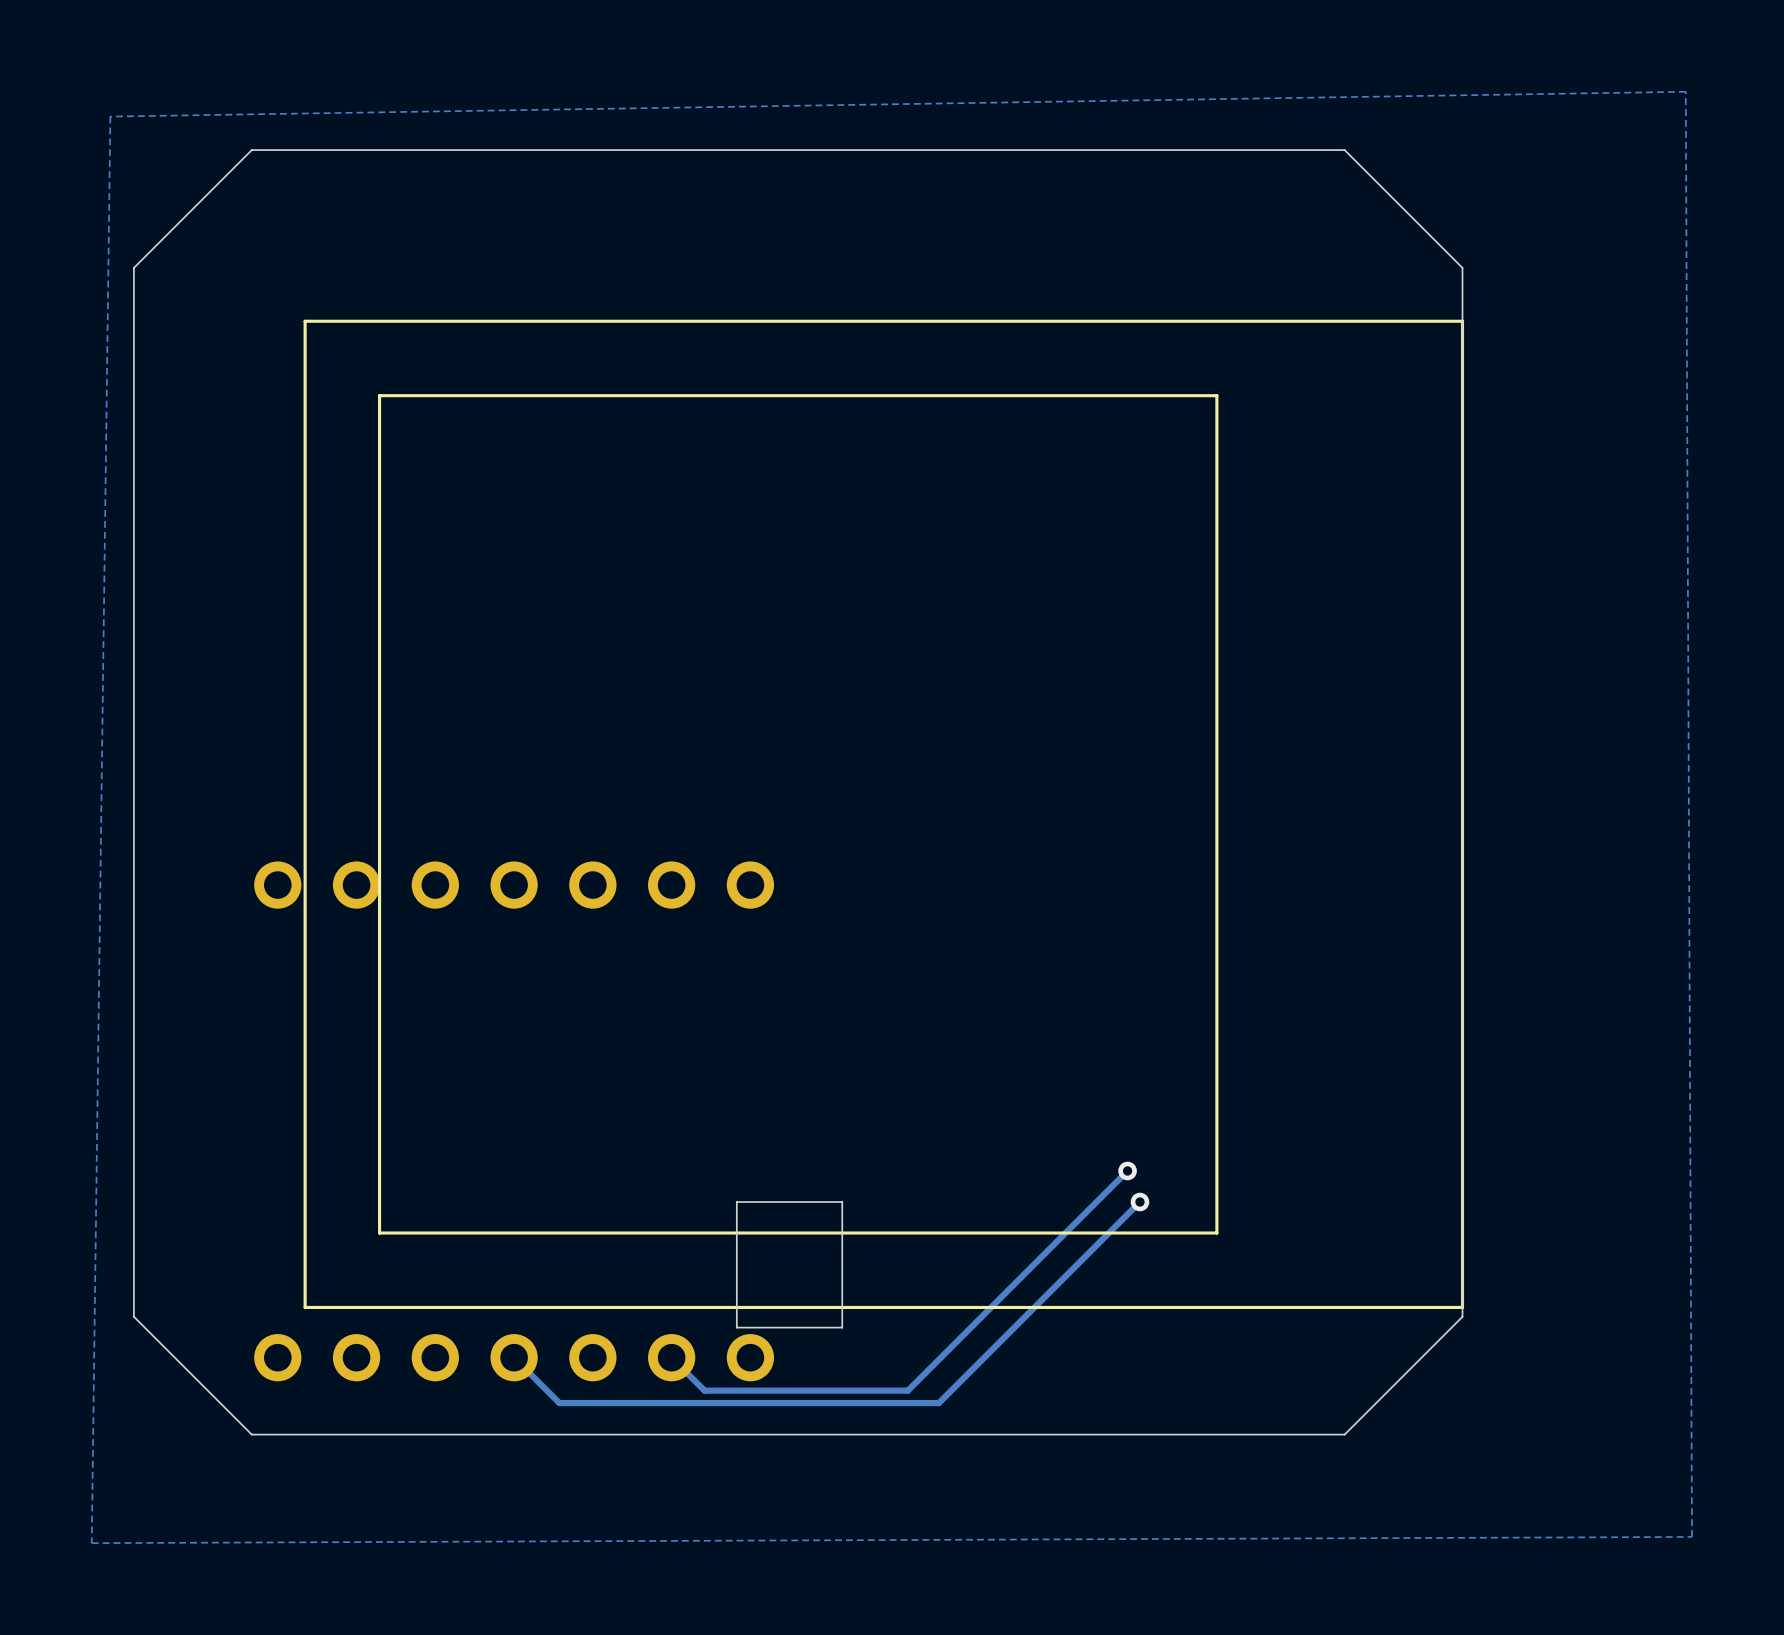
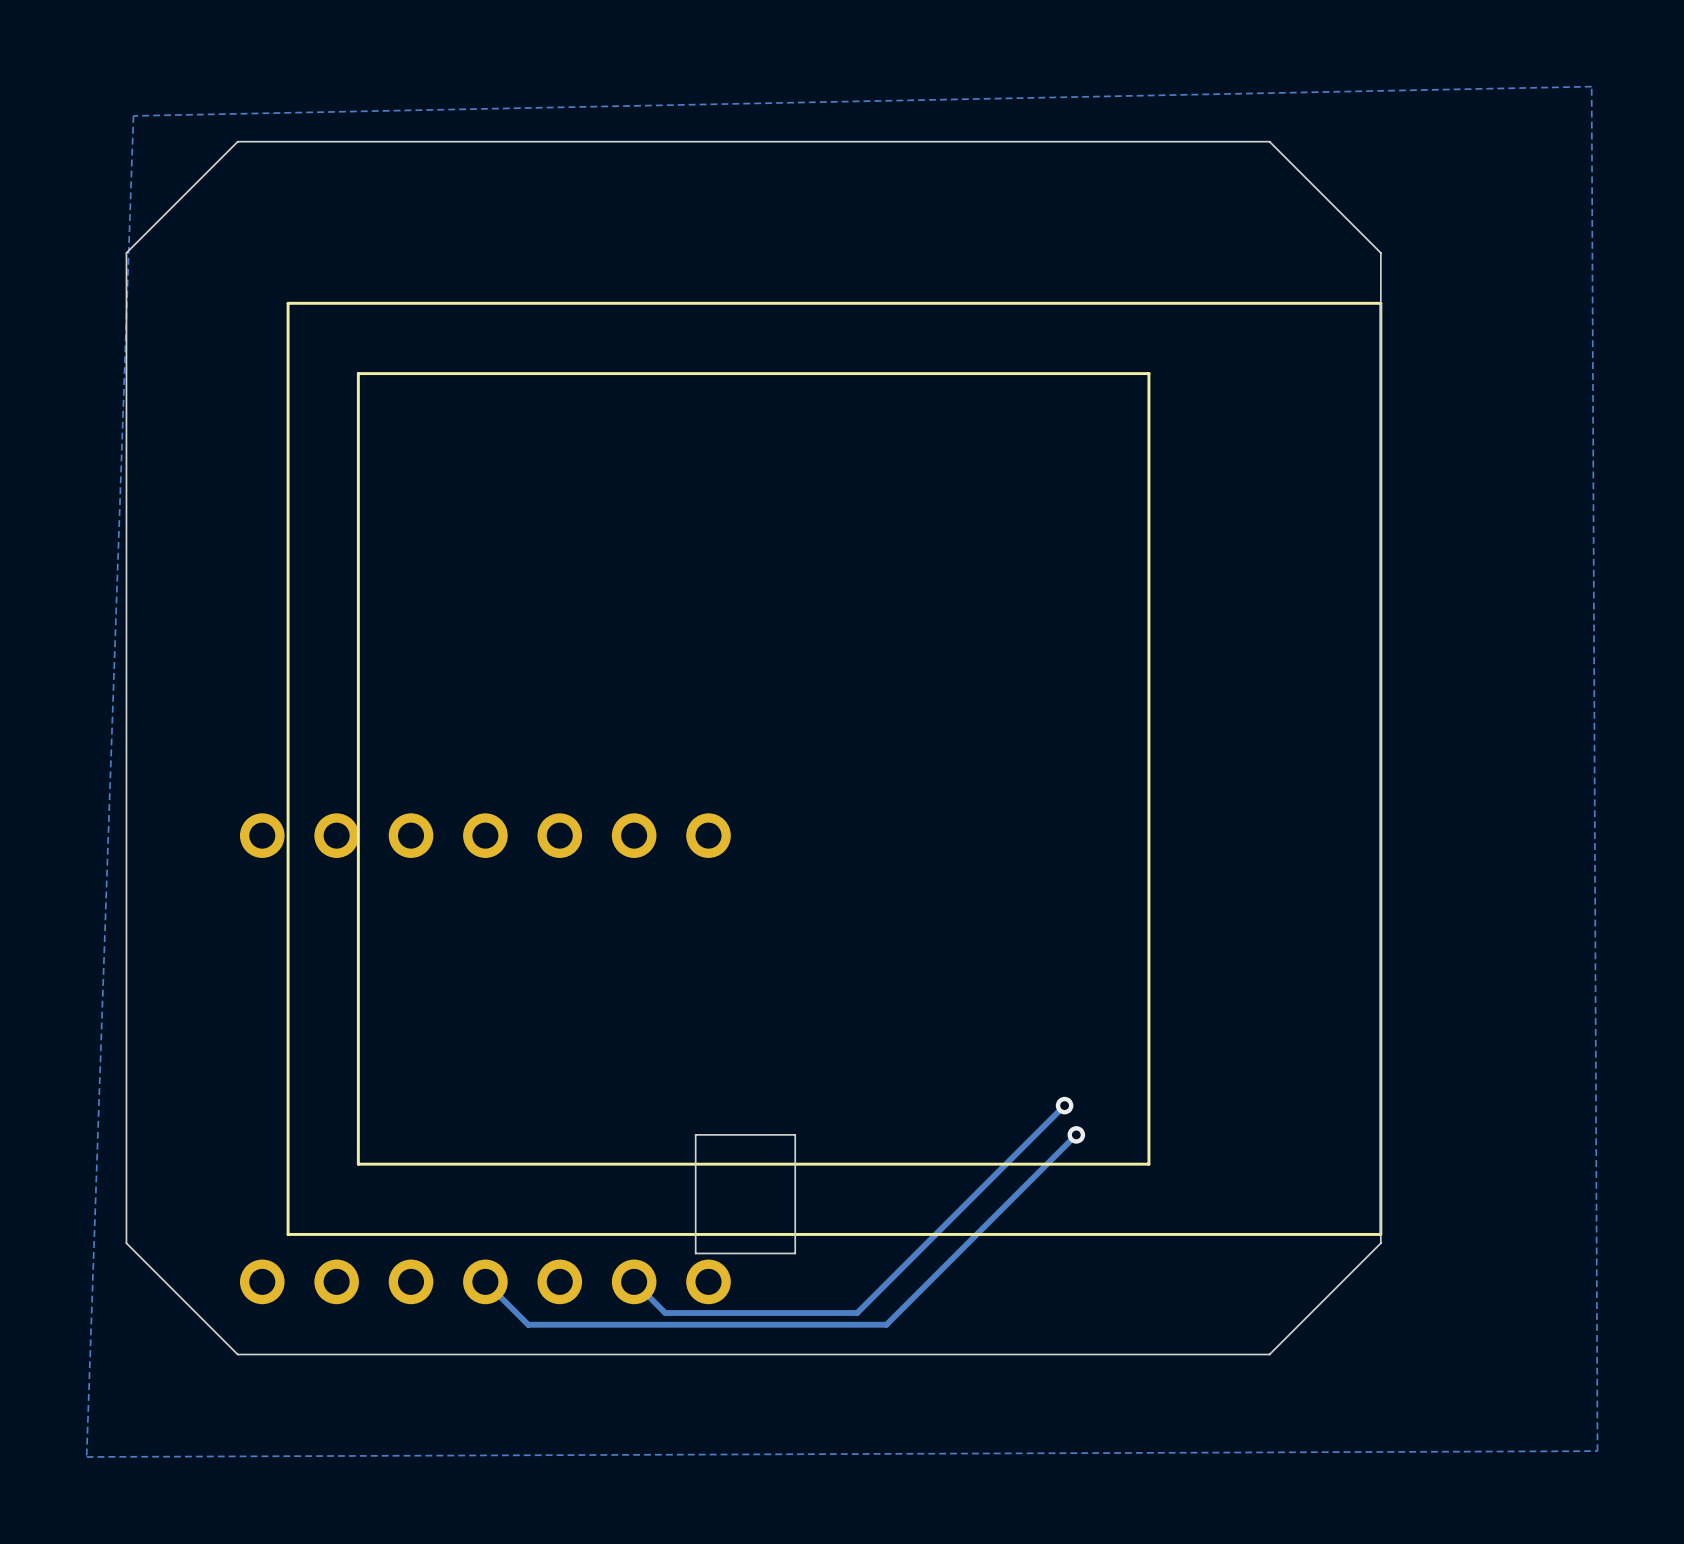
zone outline: (1685, 91) (110, 116) (91, 1543) -> (1591, 86) (133, 115) (86, 1456)

